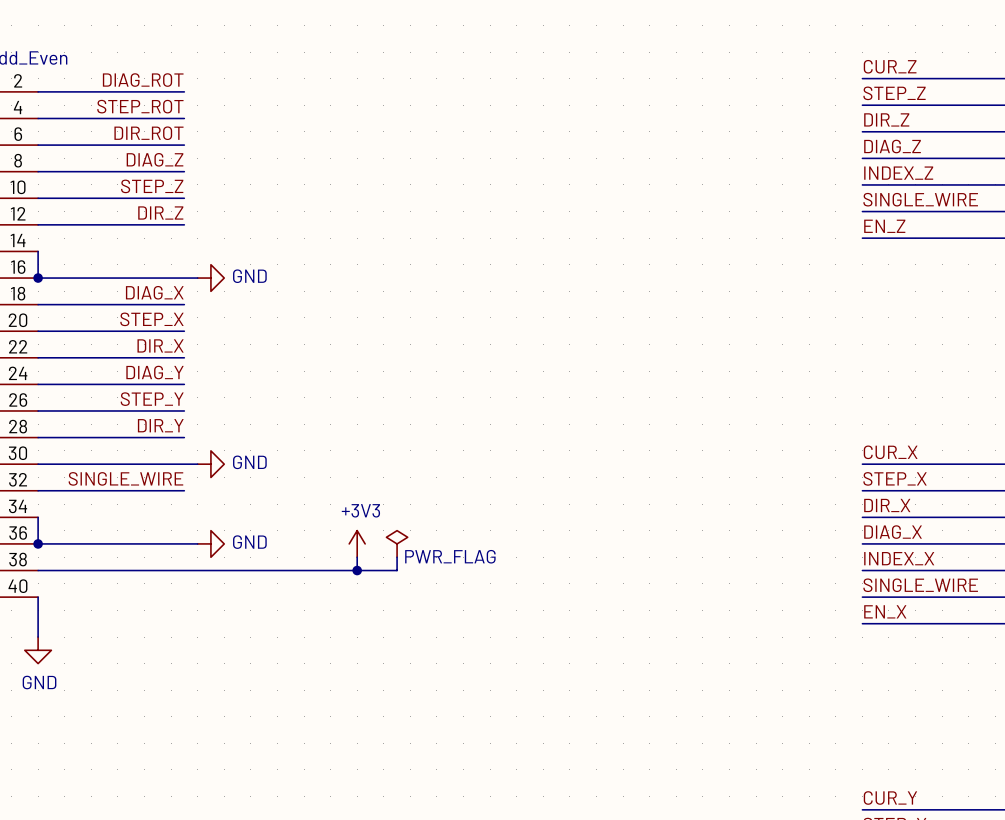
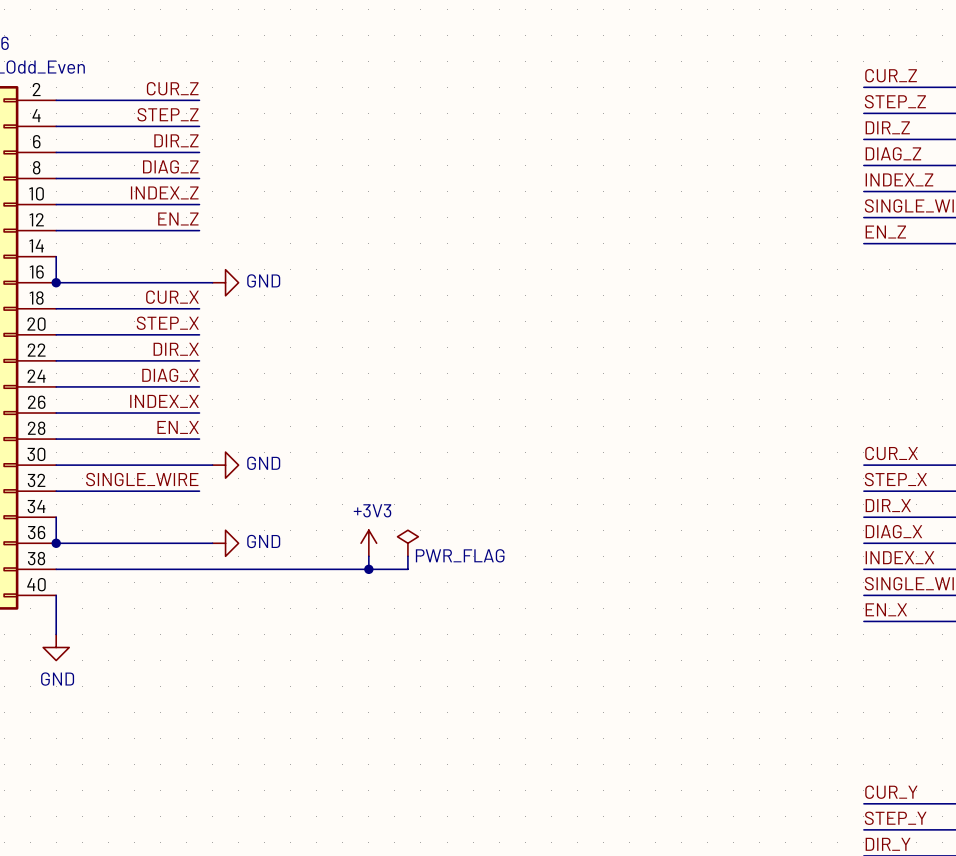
label: DIAG_ROT (143, 80) -> CUR_Z (172, 88)
label: STEP_ROT (140, 106) -> STEP_Z (168, 114)
label: DIR_ROT (148, 133) -> DIR_Z (176, 140)
label: STEP_Z (152, 186) -> INDEX_Z (164, 192)
label: DIR_Z (160, 212) -> EN_Z (178, 218)
label: DIAG_X (154, 292) -> CUR_X (172, 297)
label: DIAG_Y (155, 372) -> DIAG_X (170, 375)
label: STEP_Y (152, 399) -> INDEX_X (164, 401)
label: DIR_Y (160, 425) -> EN_X (178, 427)

